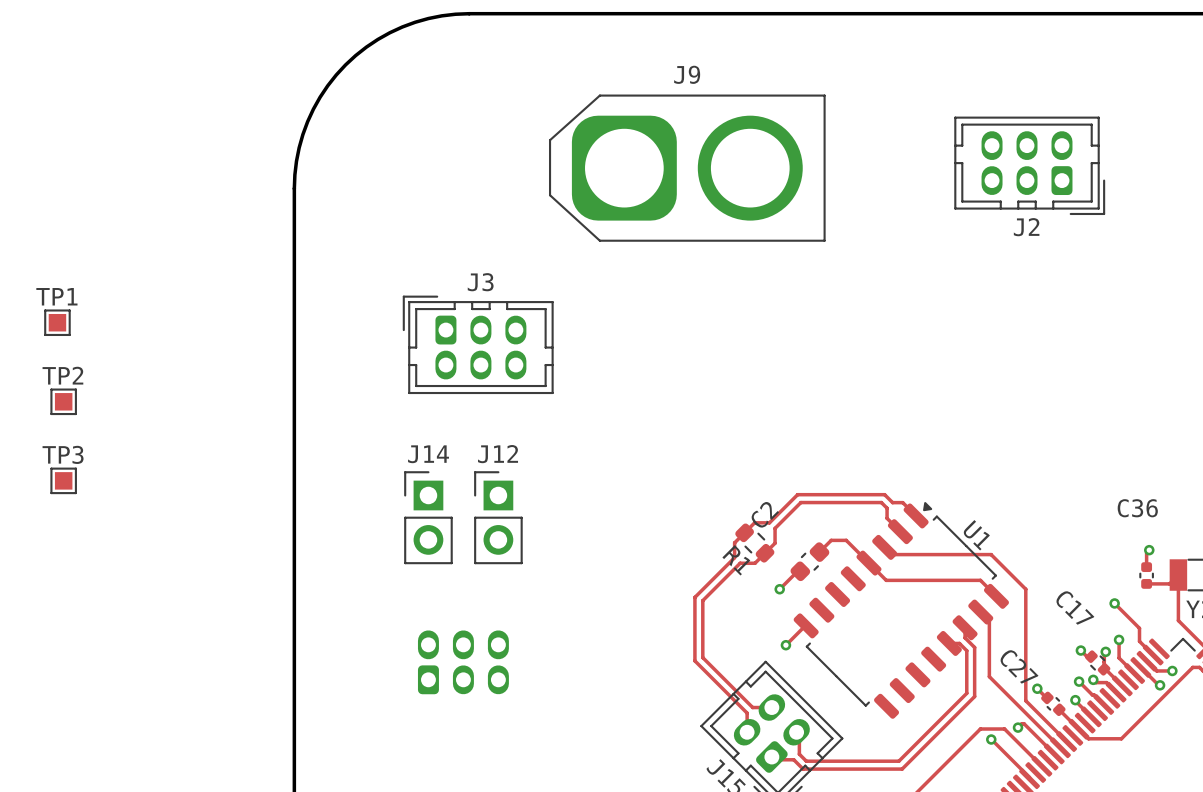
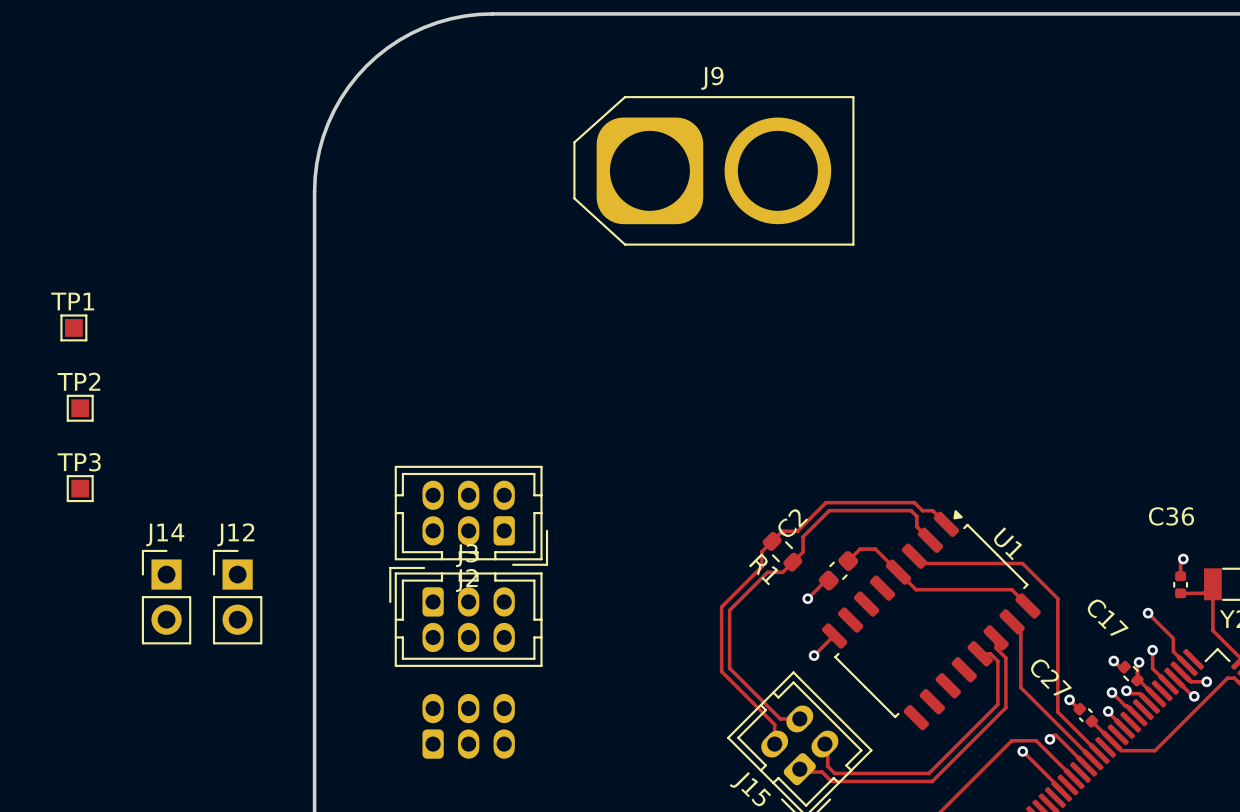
J2 position: (1029, 165) -> (471, 515)
J3 position: (478, 344) -> (465, 616)
J14 position: (428, 517) -> (166, 597)
J12 position: (498, 517) -> (237, 597)
part position: (463, 662) -> (468, 726)

